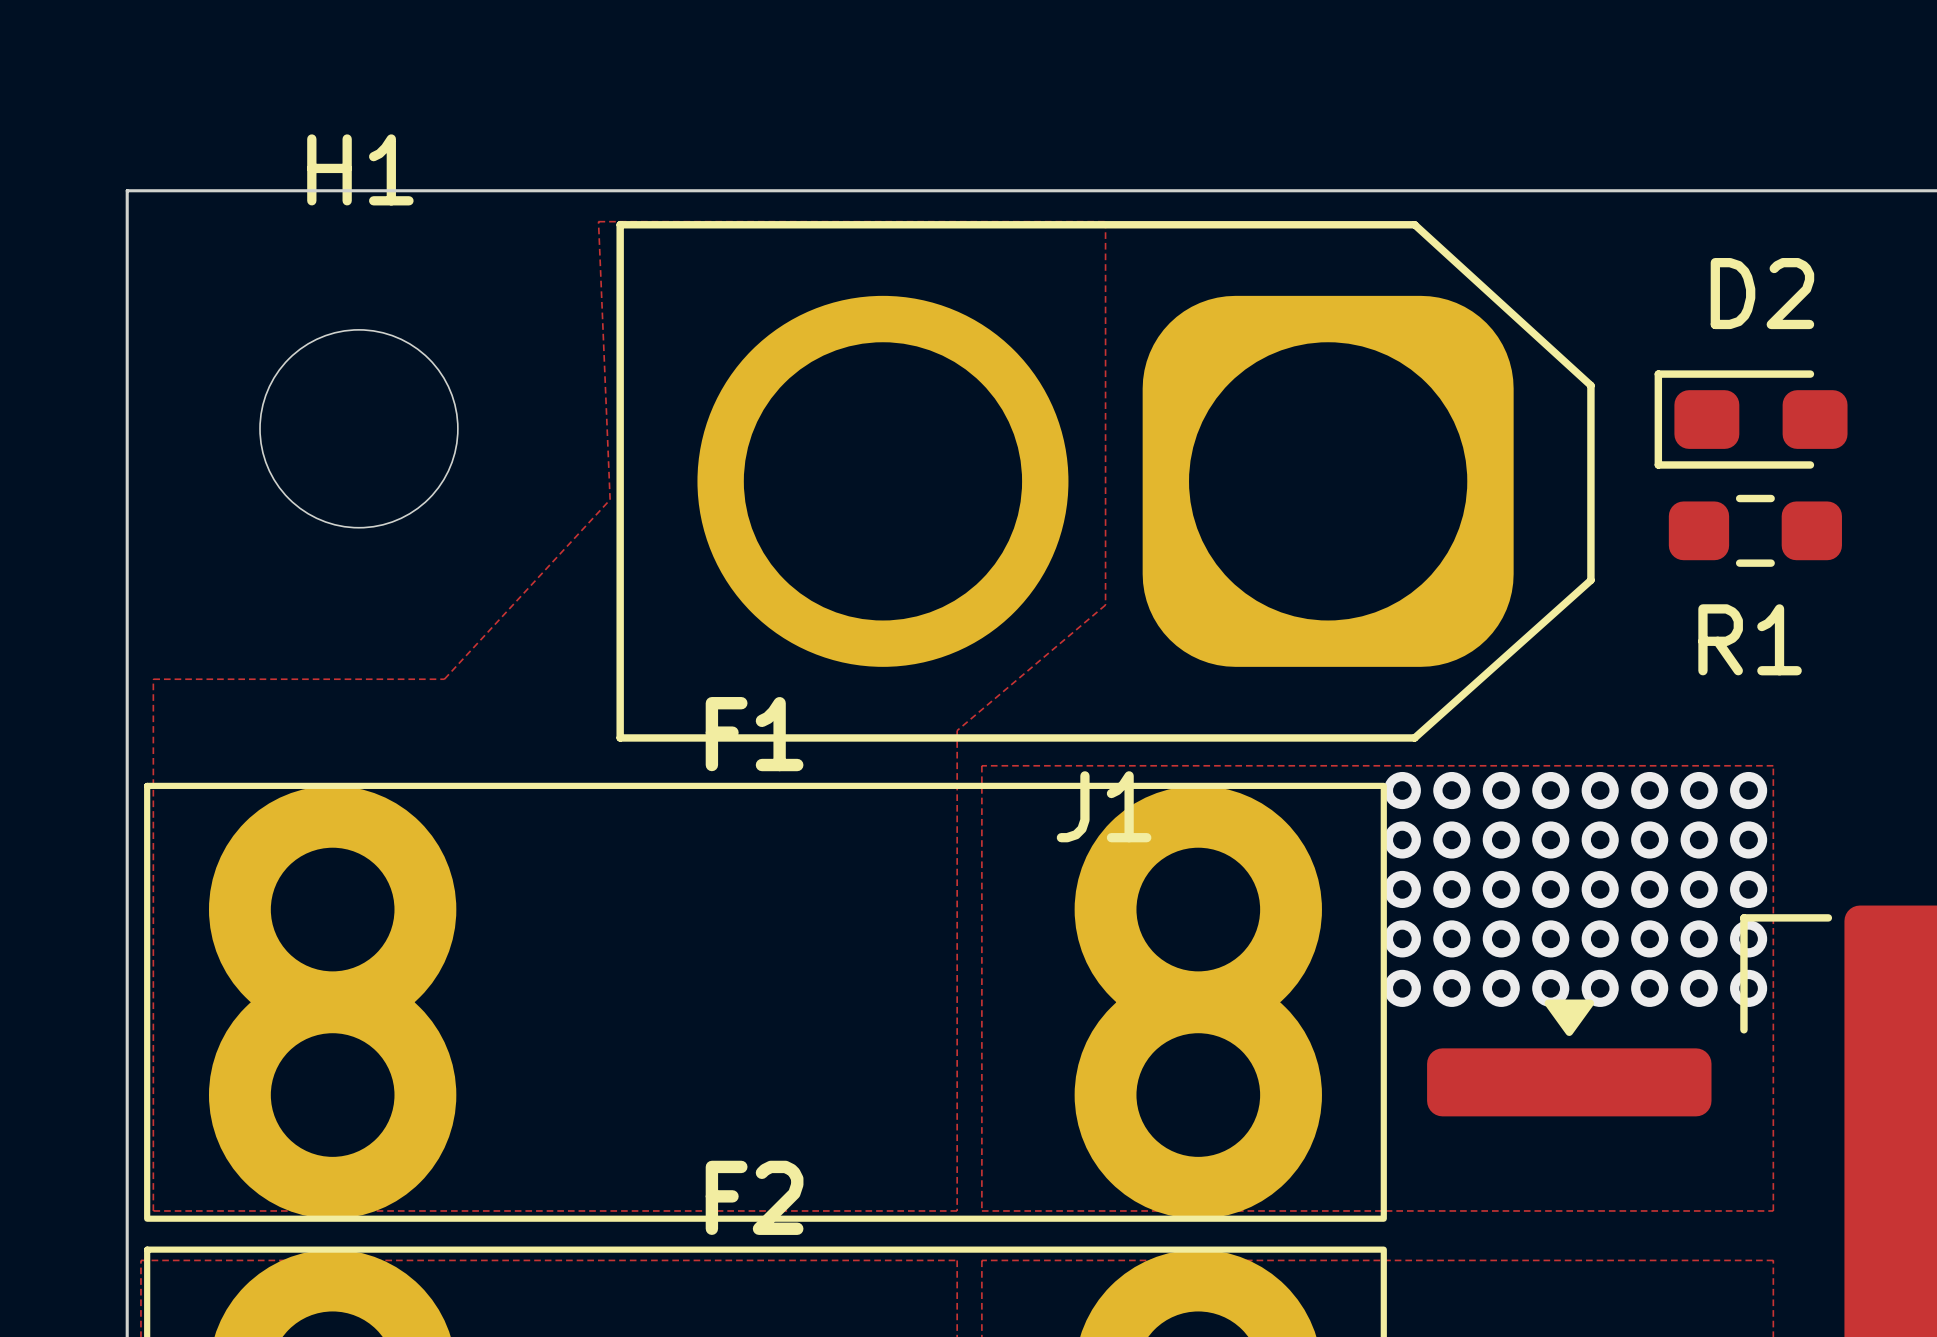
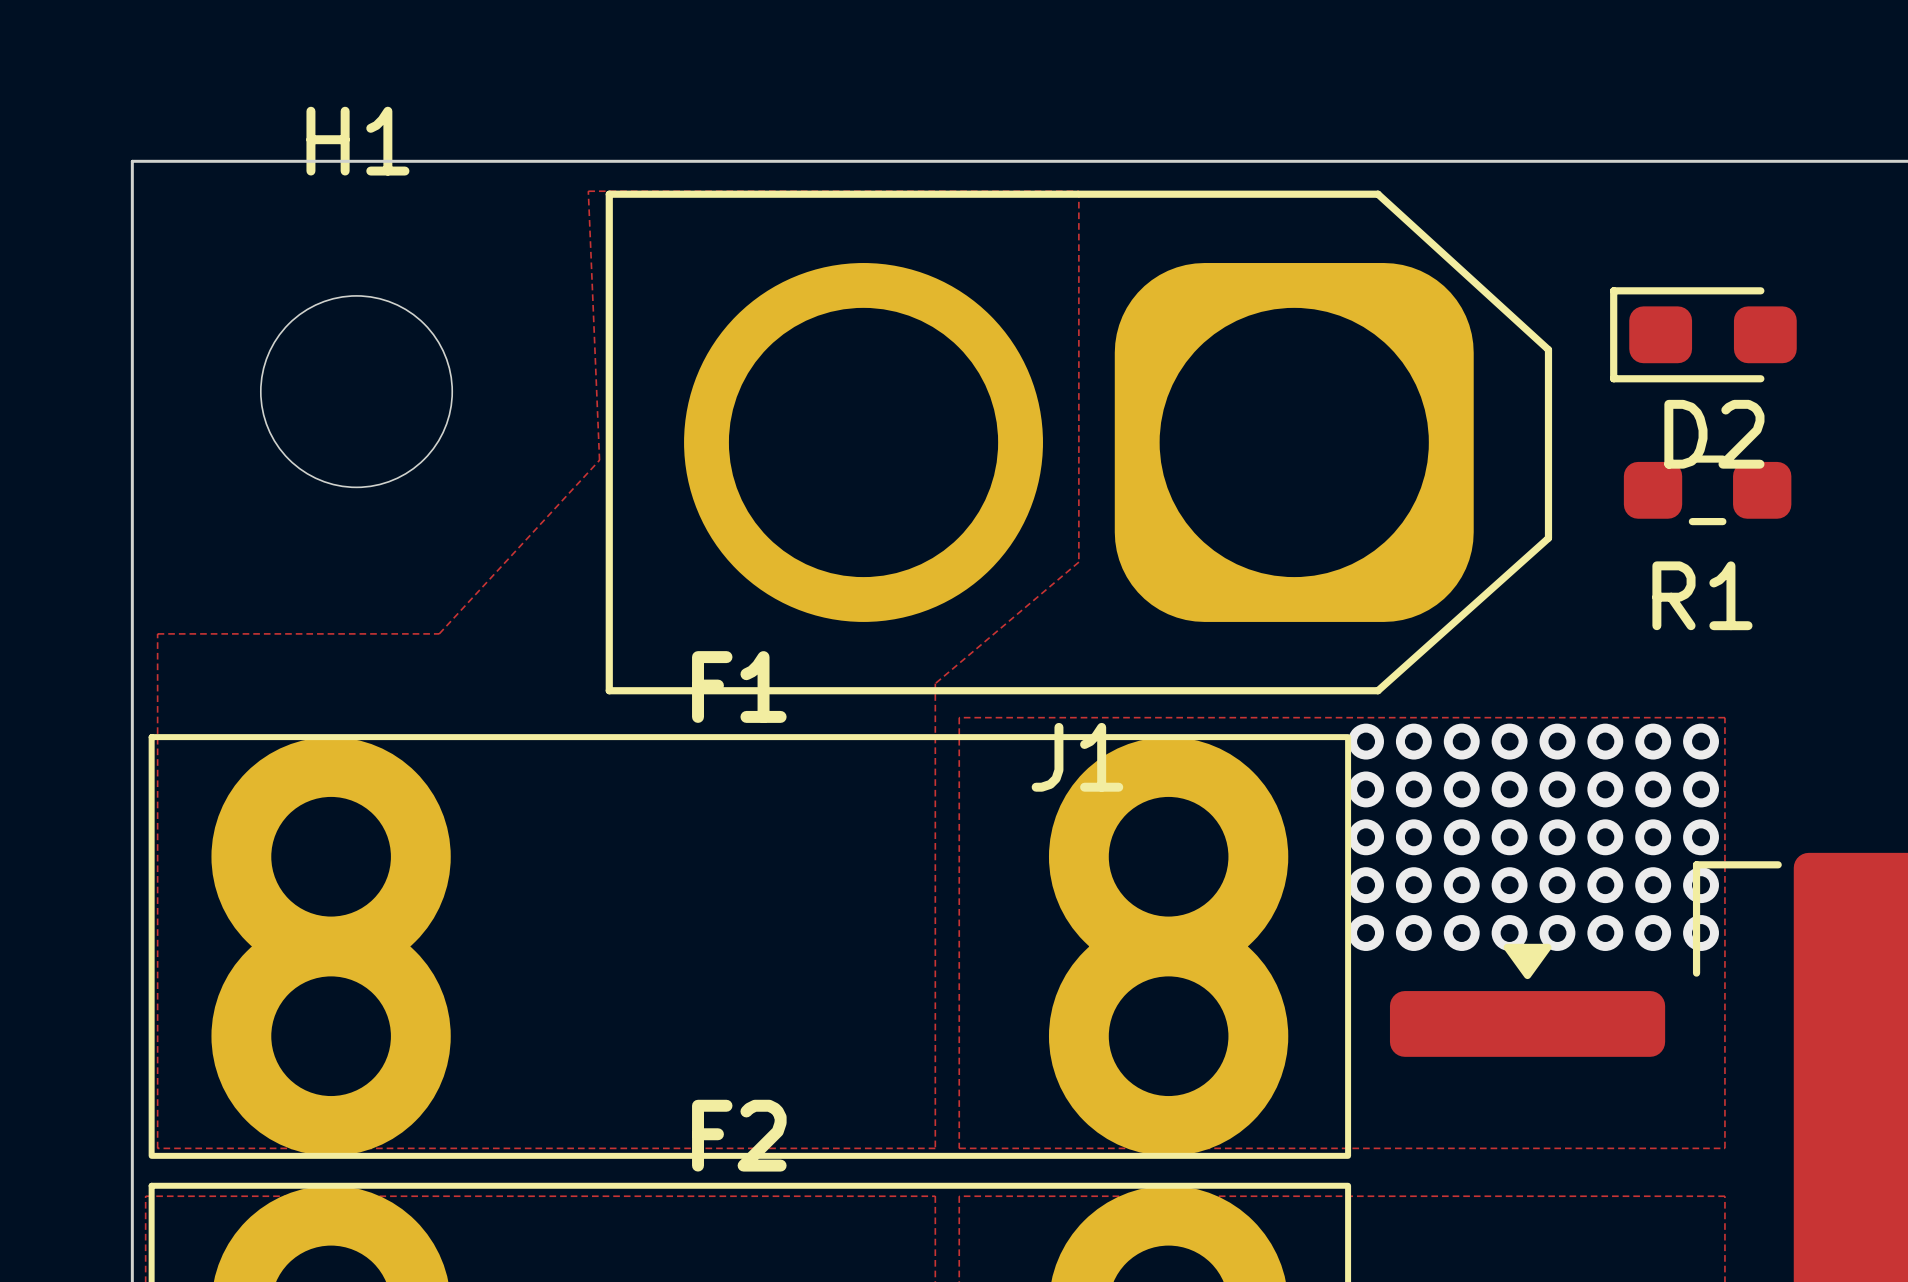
D2 name position: D2 (1762, 293) -> D2 (1714, 434)
D2 position: (1751, 419) -> (1703, 334)

